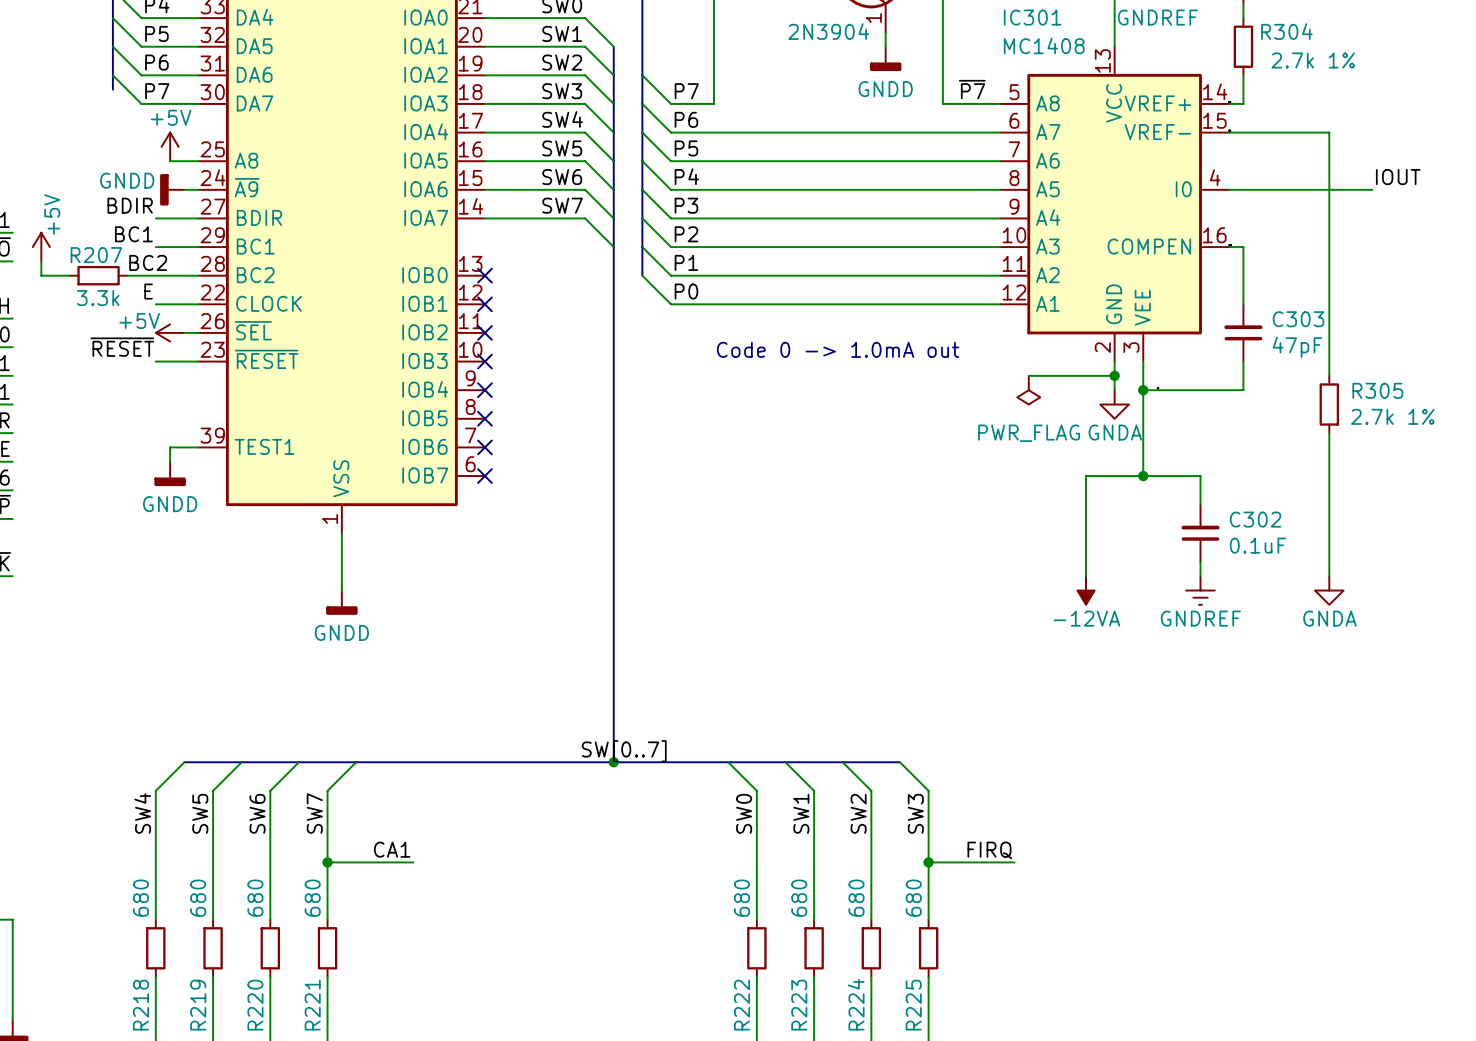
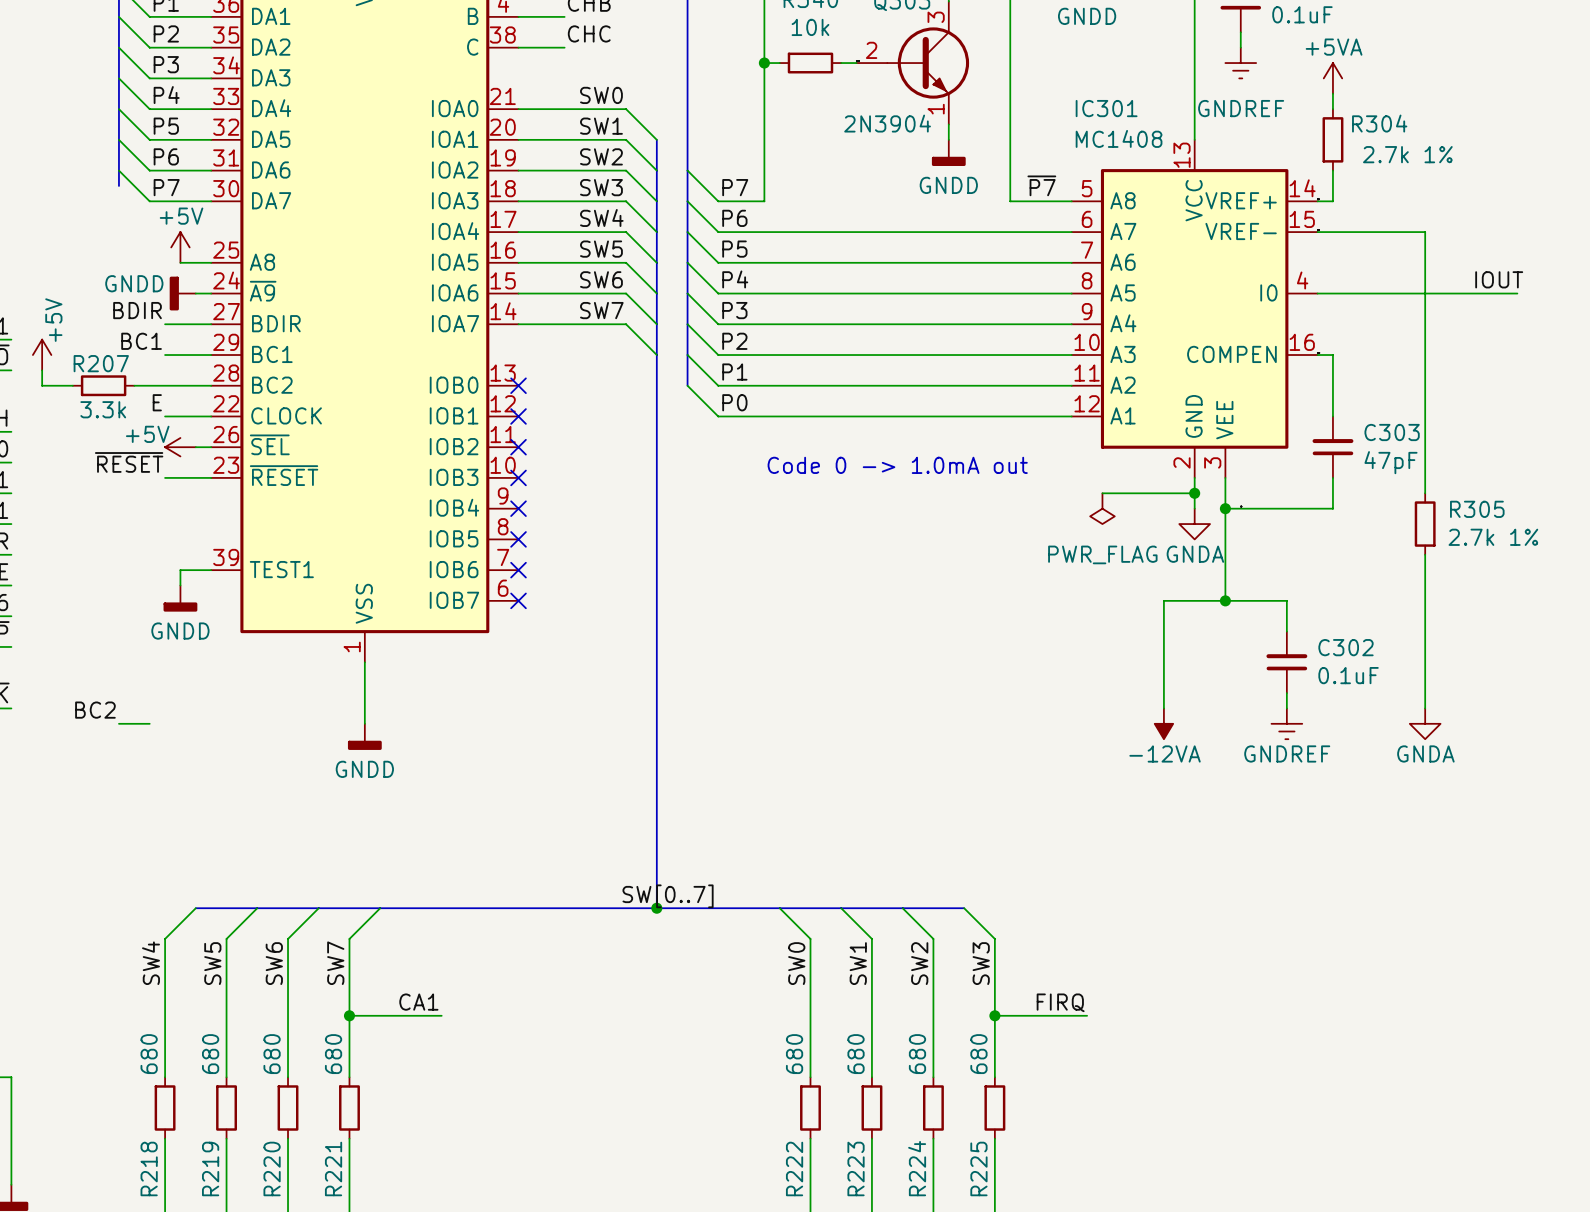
wire: none -> (1471, 293) (1517, 293)
label: BC2 (148, 262) -> none
label: none -> BC2 (95, 710)
wire: none -> (118, 723) (149, 723)

